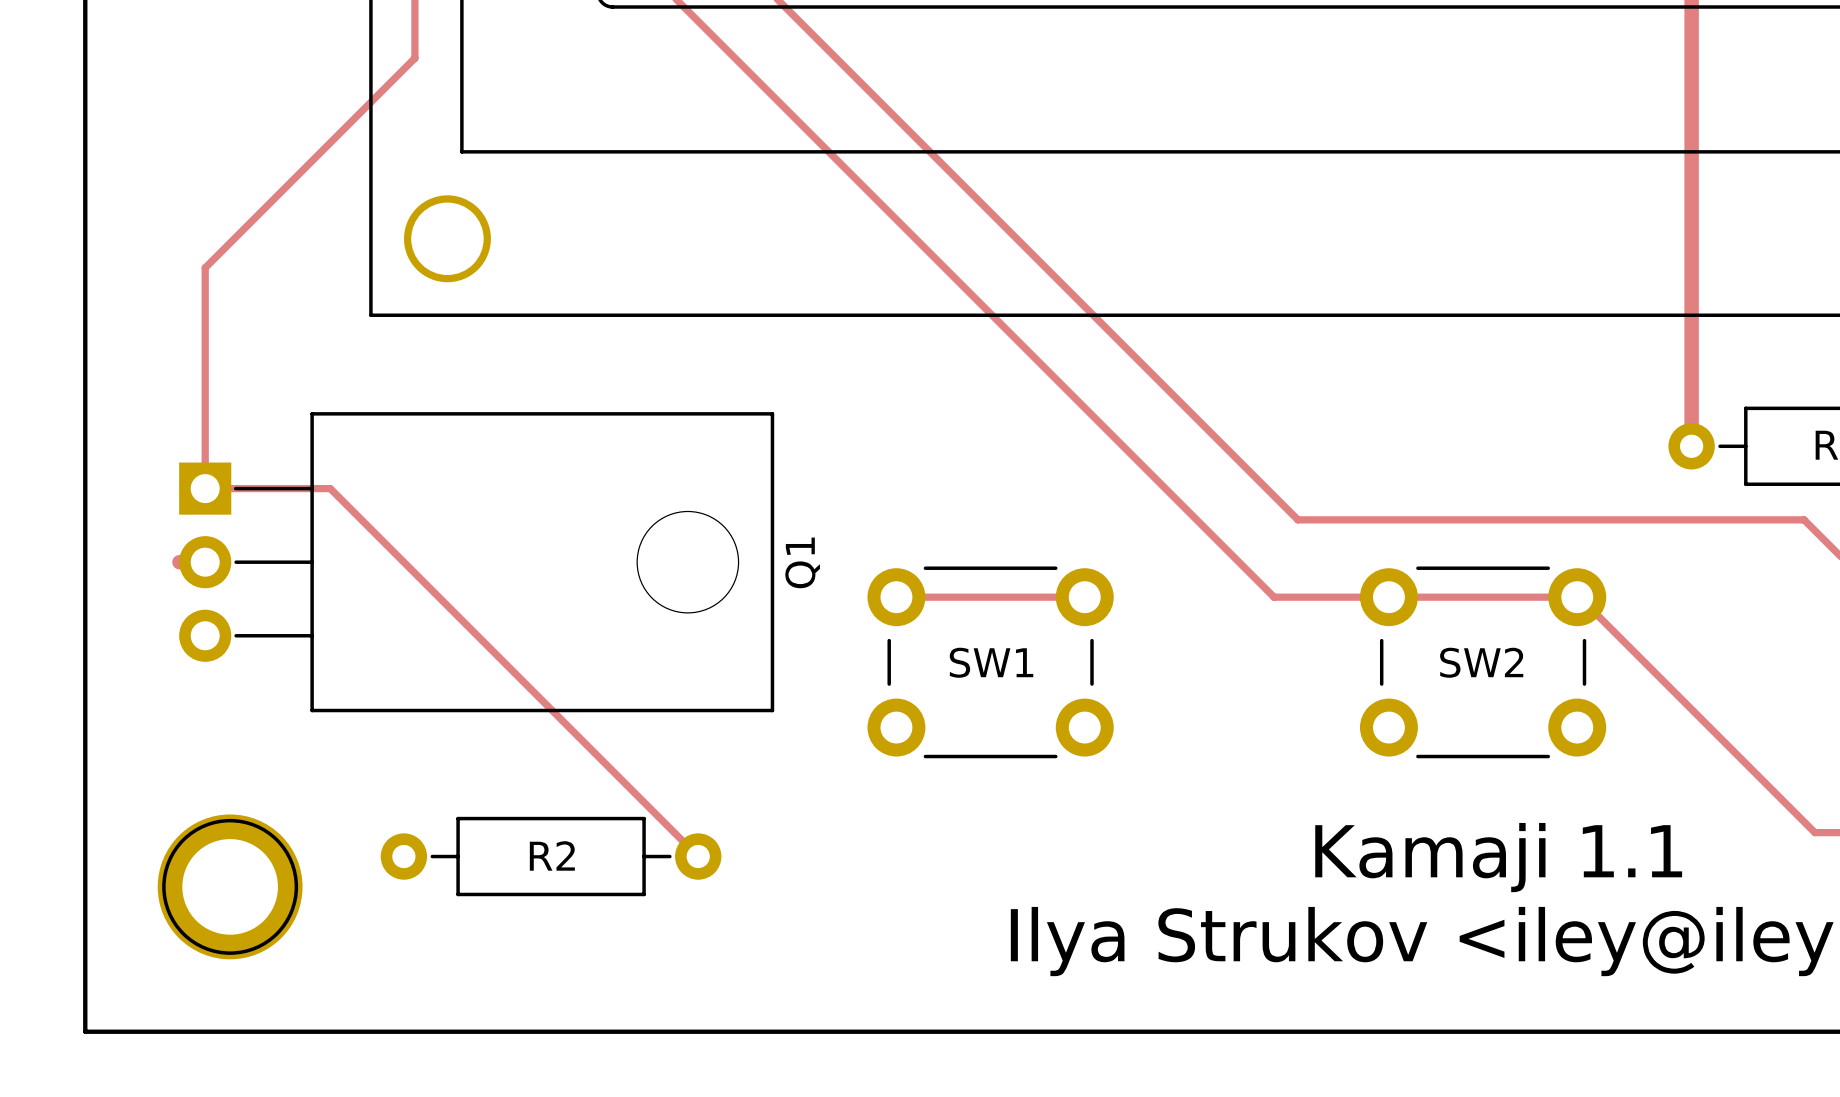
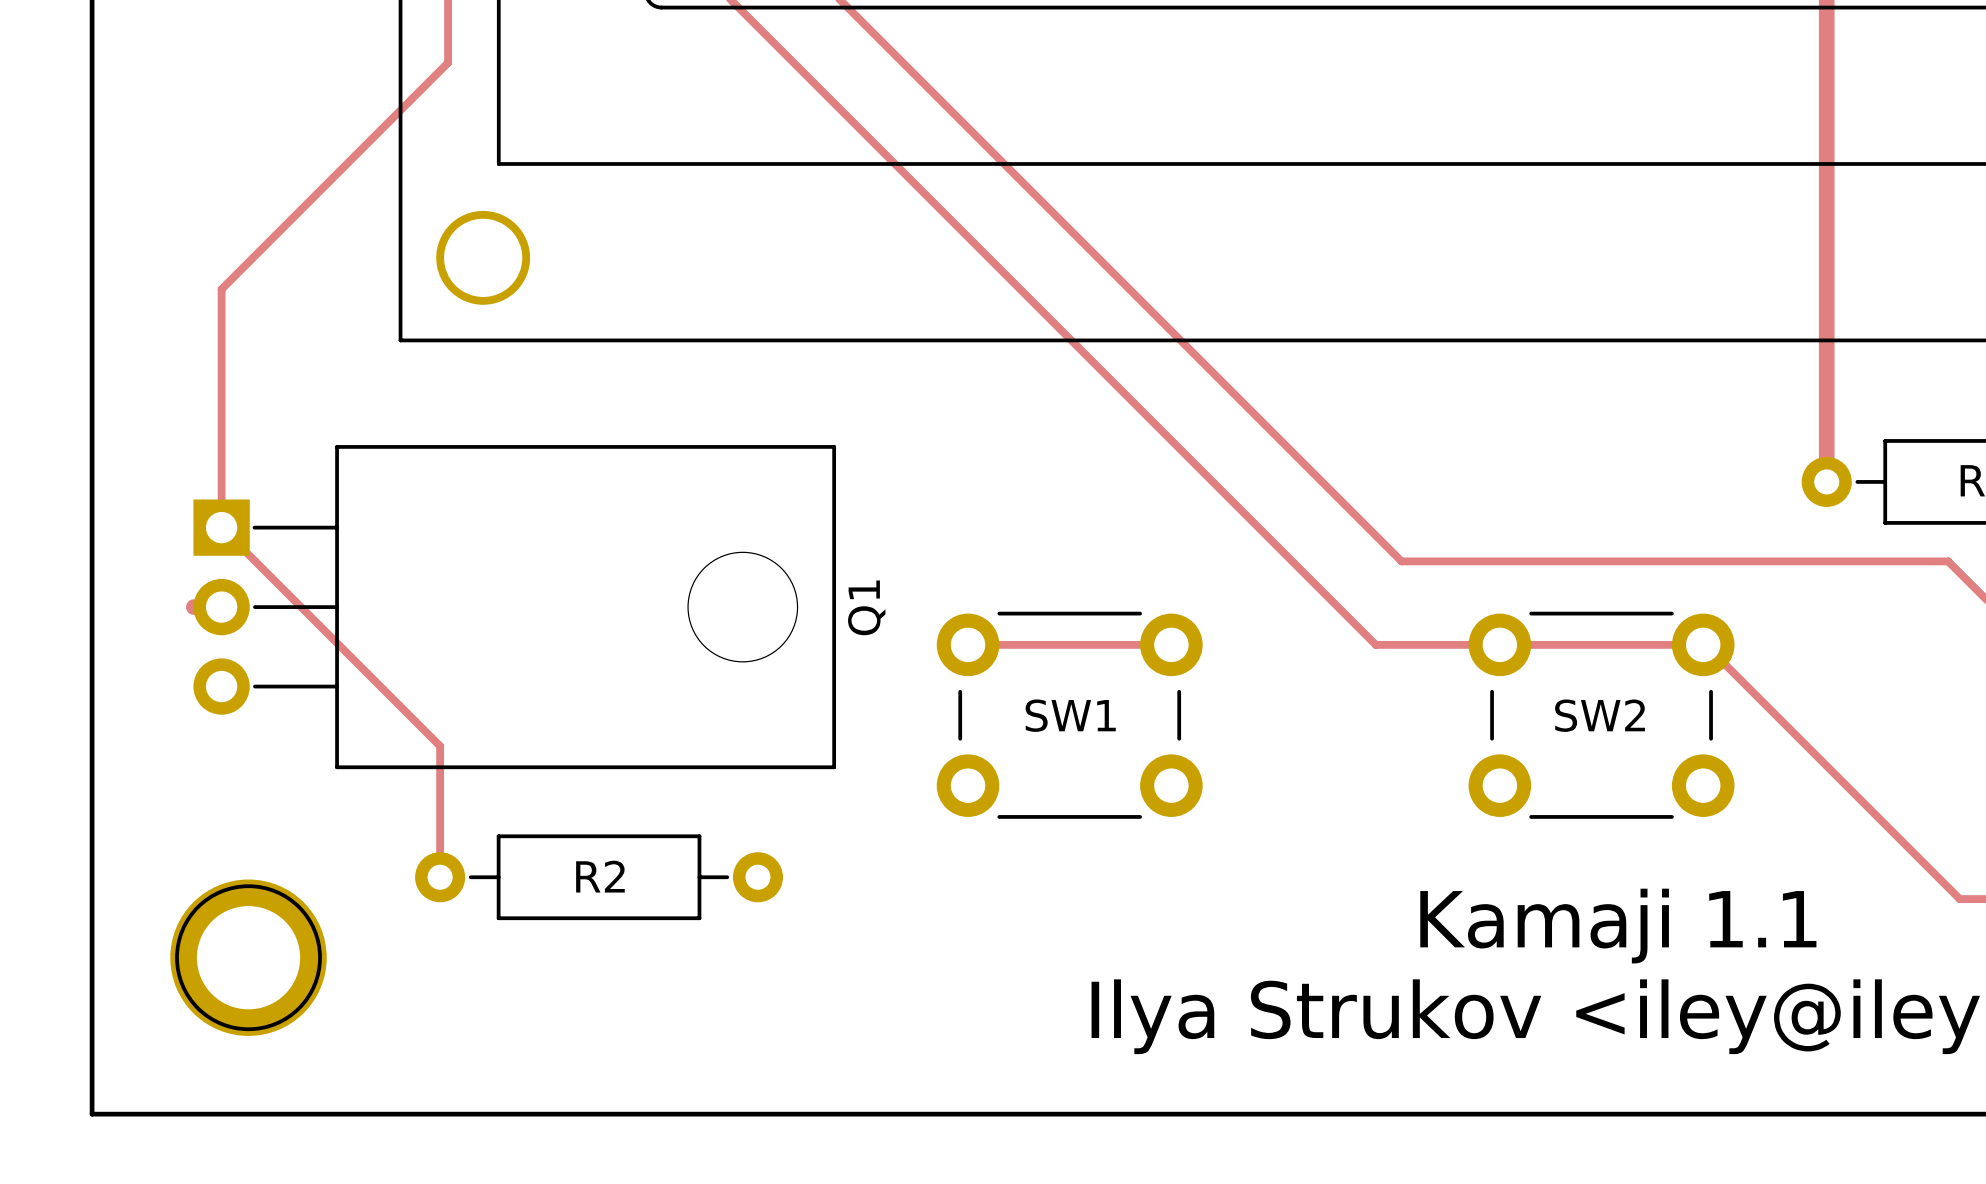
track: (205, 488) (330, 488) (698, 856) -> (221, 527) (440, 746) (440, 877)
R2 position: (551, 856) -> (599, 877)

